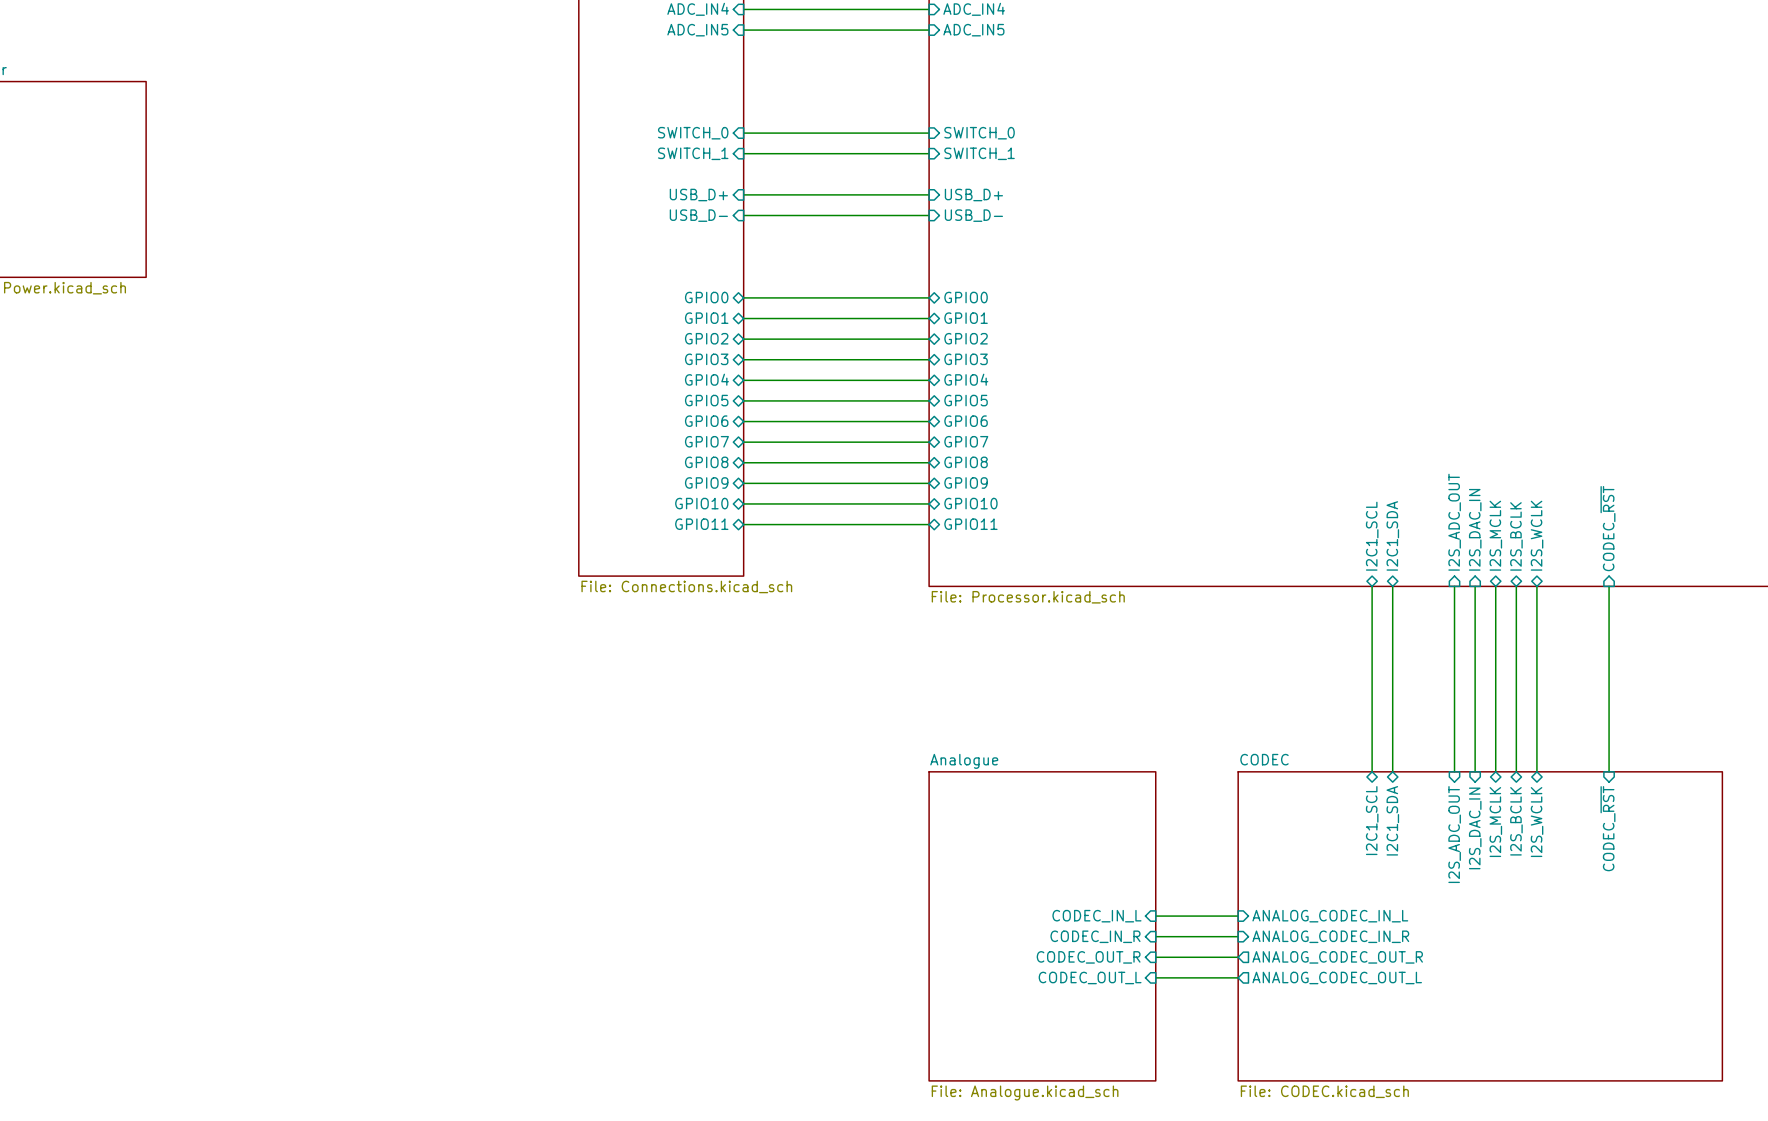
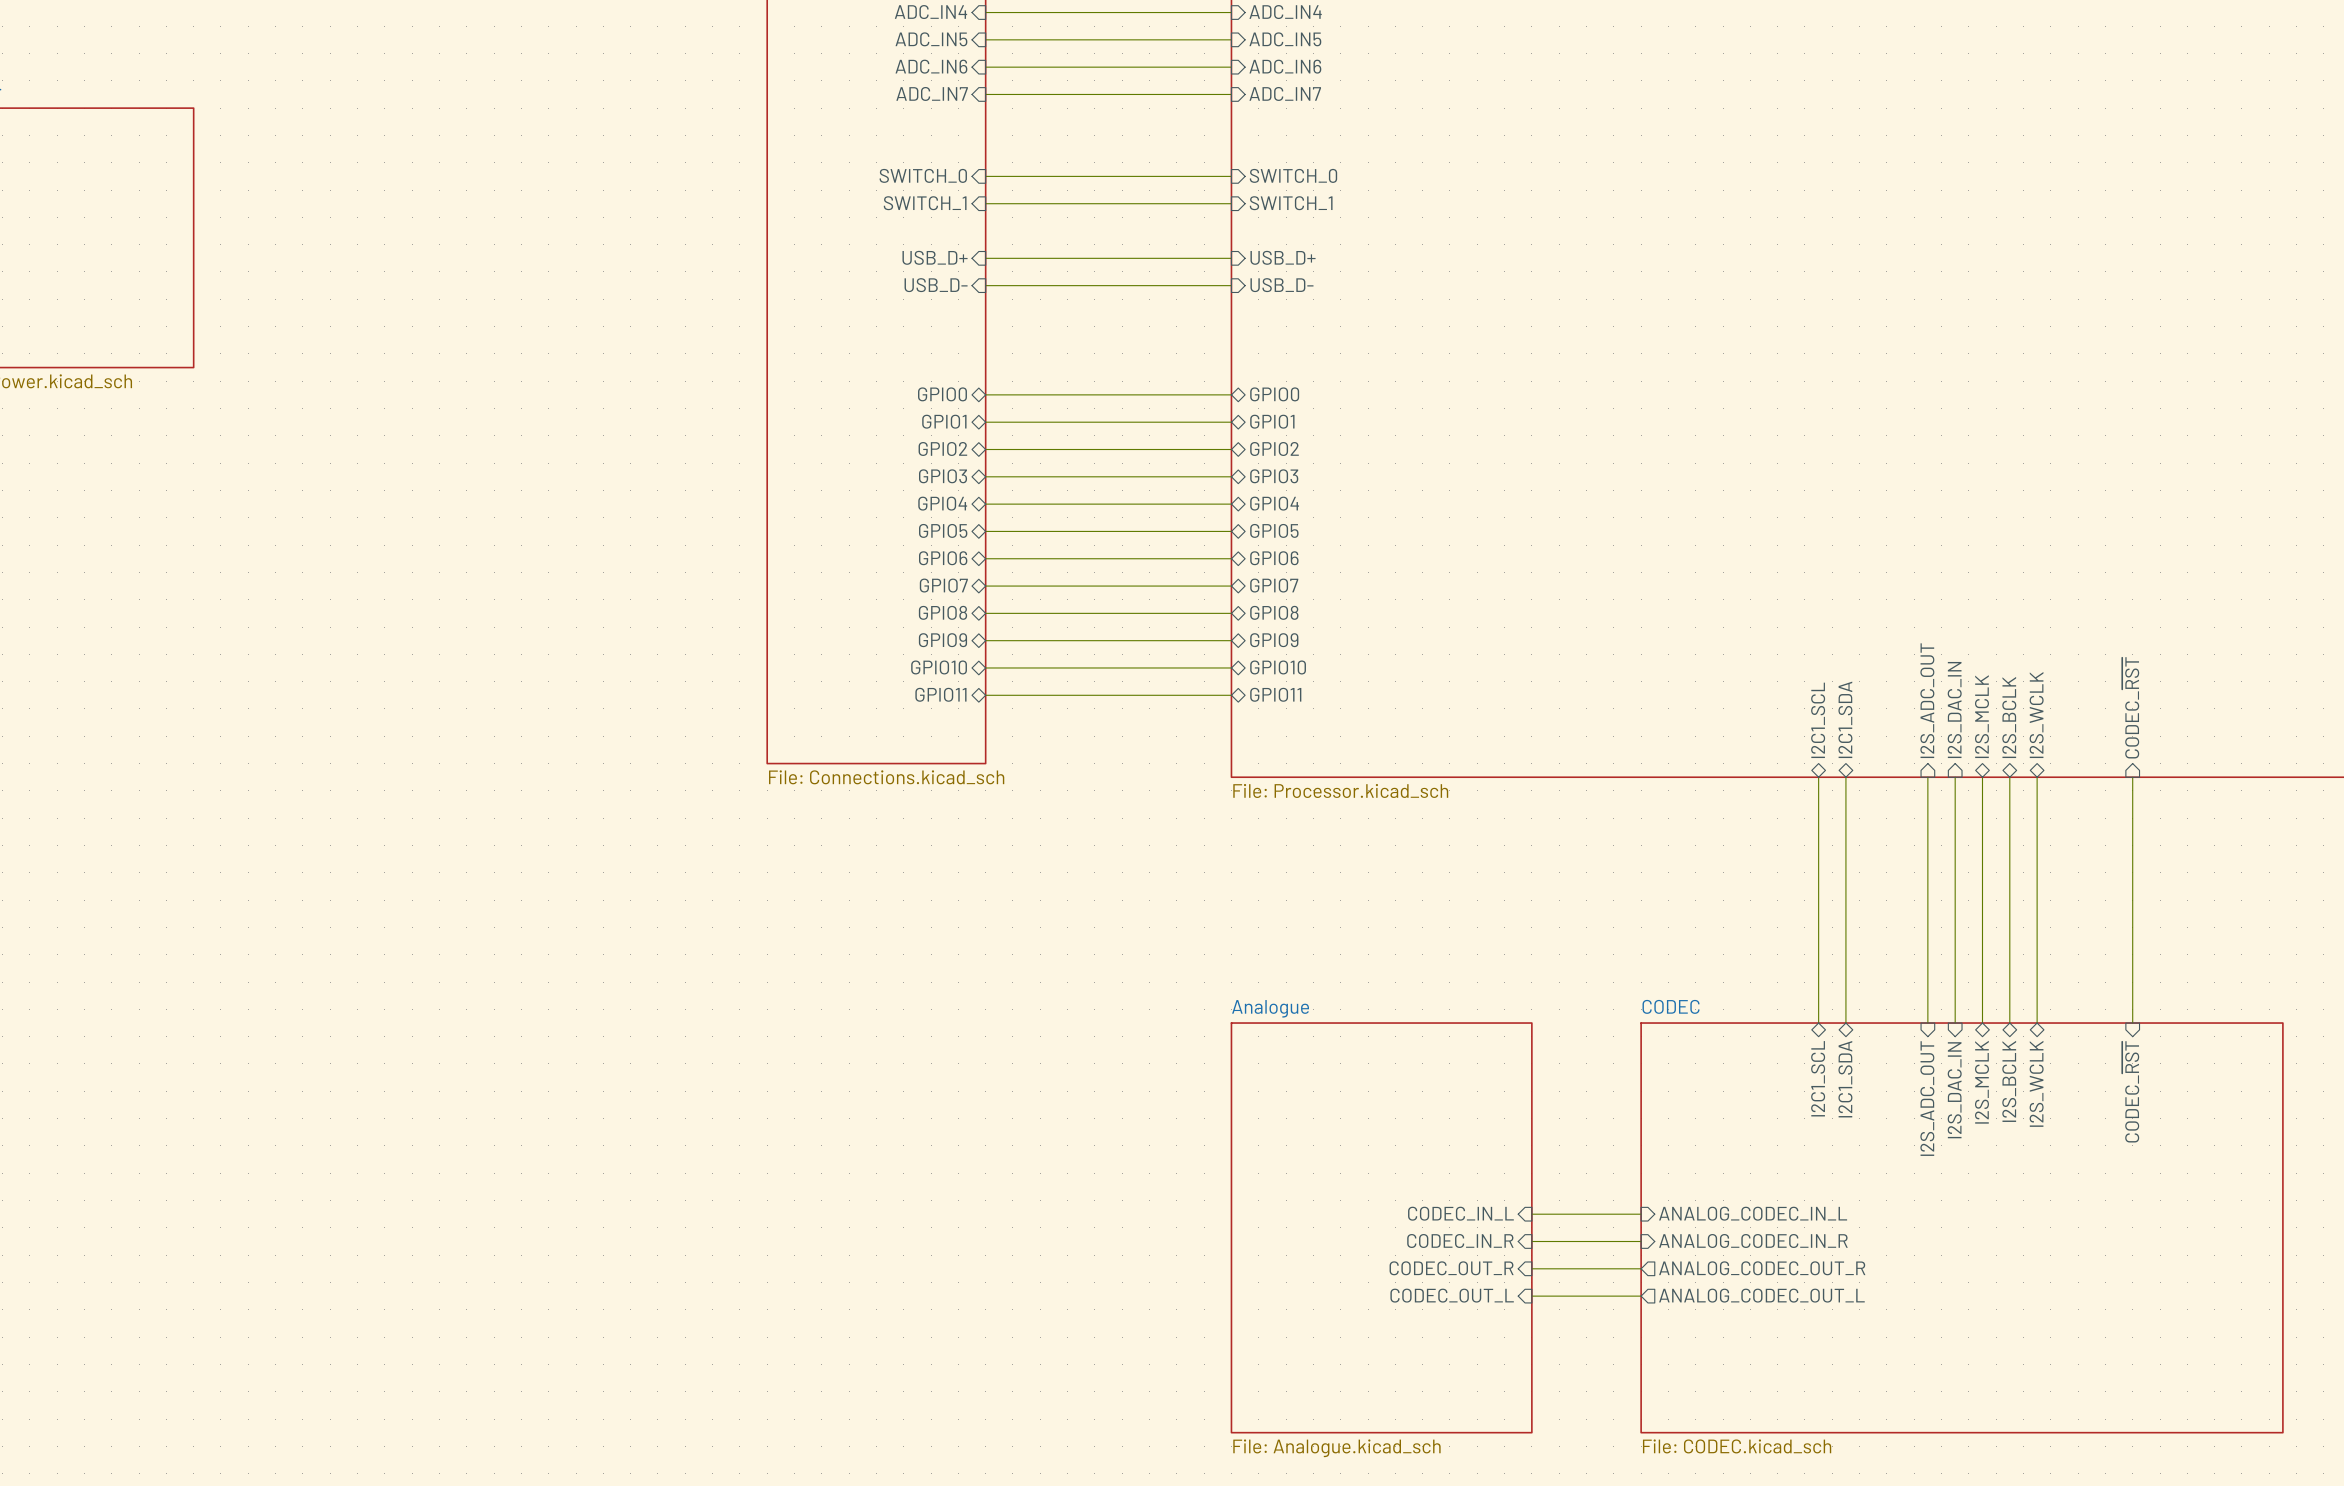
sheet pin: none -> ADC_IN6 (931, 66)
wire: none -> (985, 67) (1231, 67)
sheet pin: none -> ADC_IN6 (1285, 66)
sheet pin: none -> ADC_IN7 (932, 93)
wire: none -> (985, 94) (1231, 94)
sheet pin: none -> ADC_IN7 (1285, 93)

